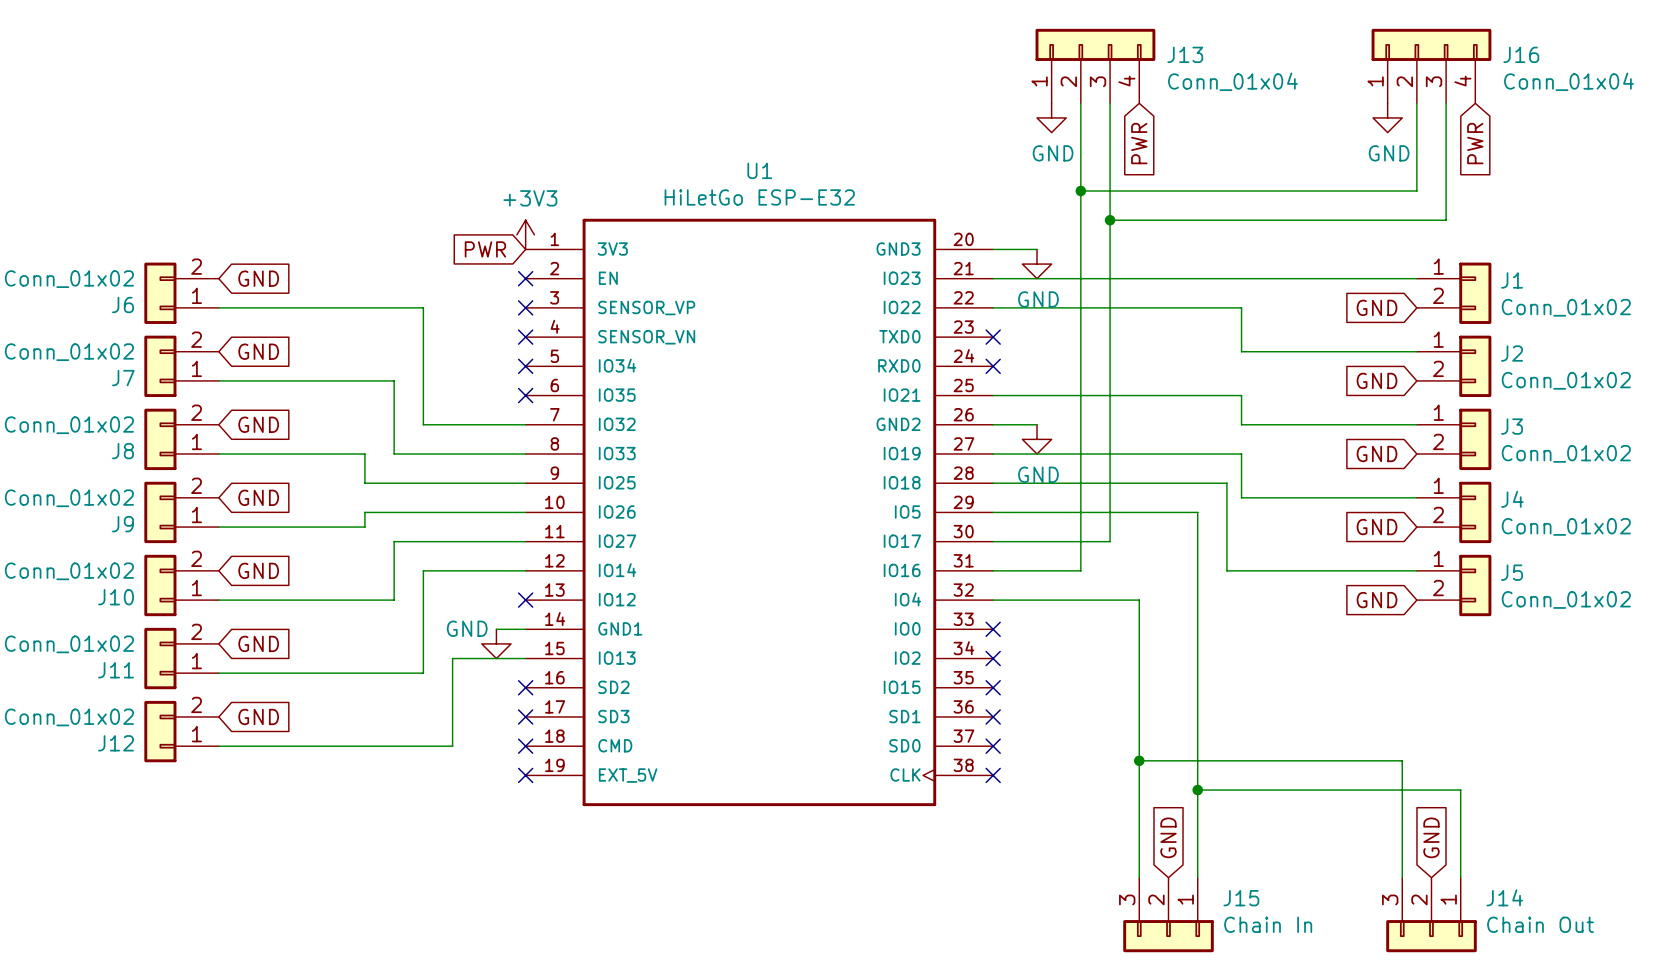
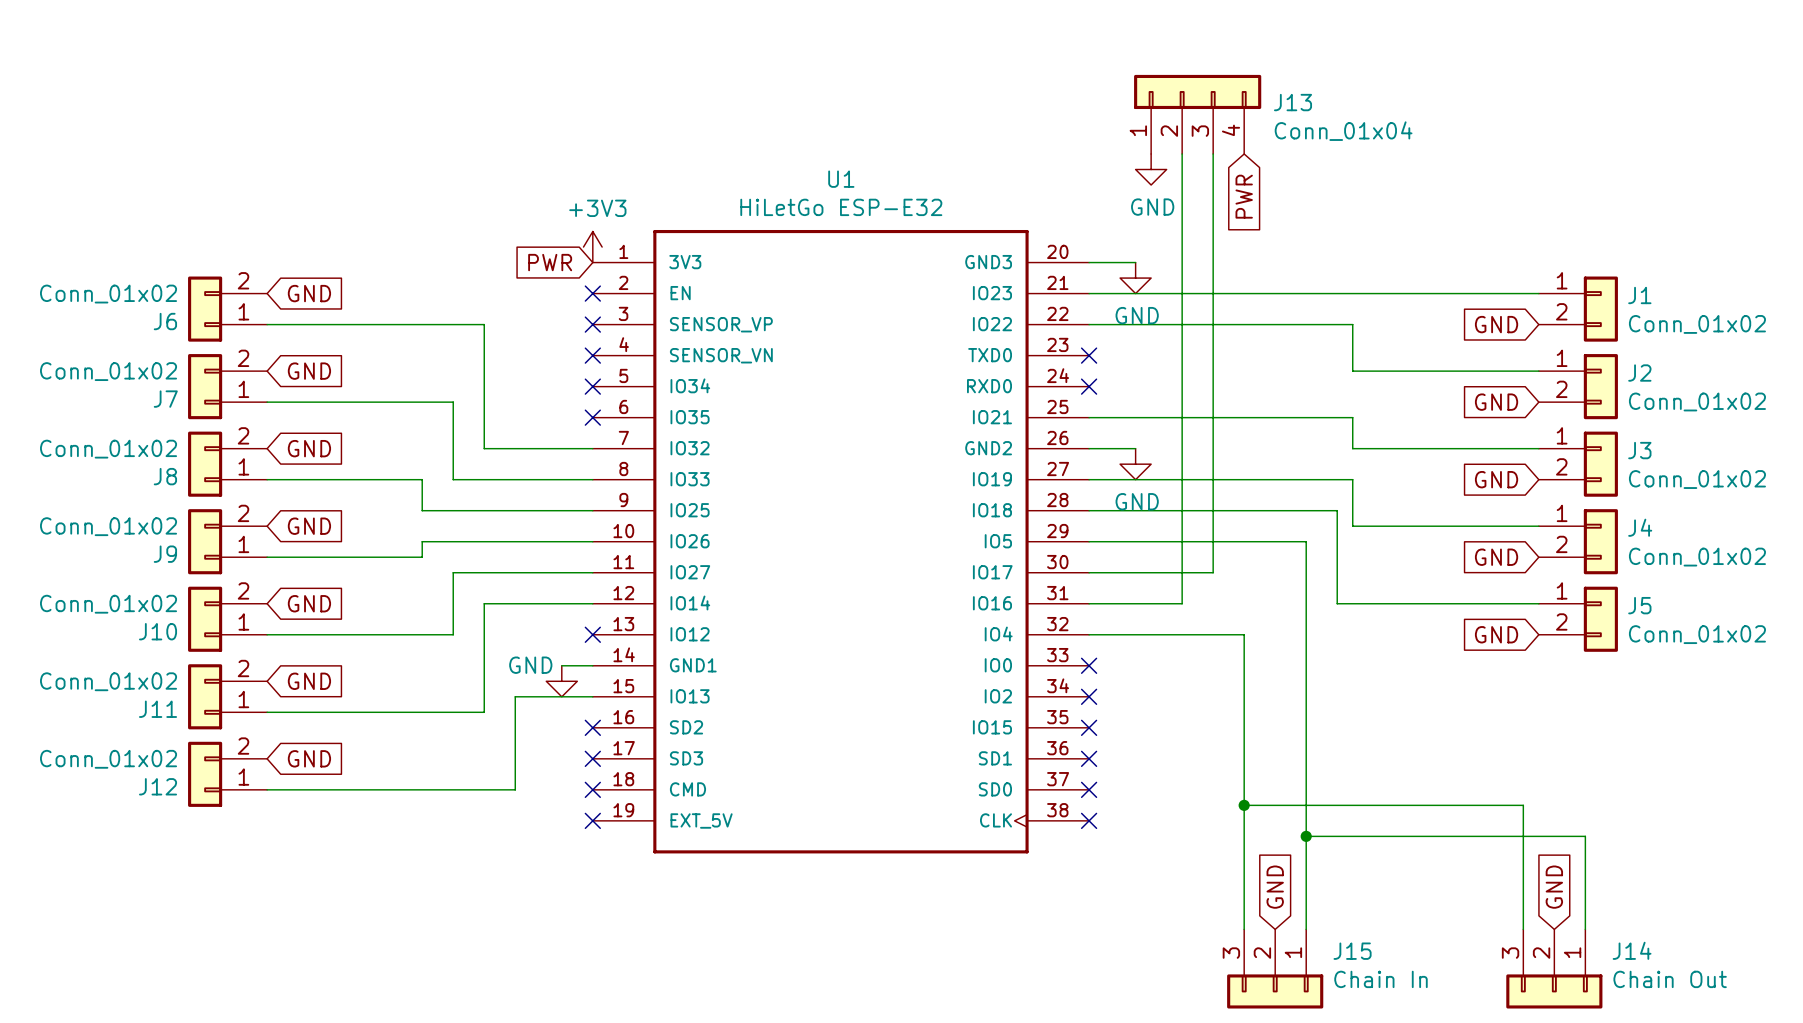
J13 position: (1095, 66) -> (1197, 114)
J16: Conn_01x04 (1431, 66) -> none
wire: (1416, 103) (1416, 191) (1080, 191) -> none
wire: (1446, 103) (1446, 220) (1110, 220) -> none
power symbol position: GND (1051, 117) -> GND (1151, 169)
power symbol: GND (1387, 117) -> none
global label position: PWR (1139, 143) -> PWR (1244, 196)
global label: PWR (1475, 143) -> none
junction: (1080, 191) -> none
junction: (1110, 220) -> none

